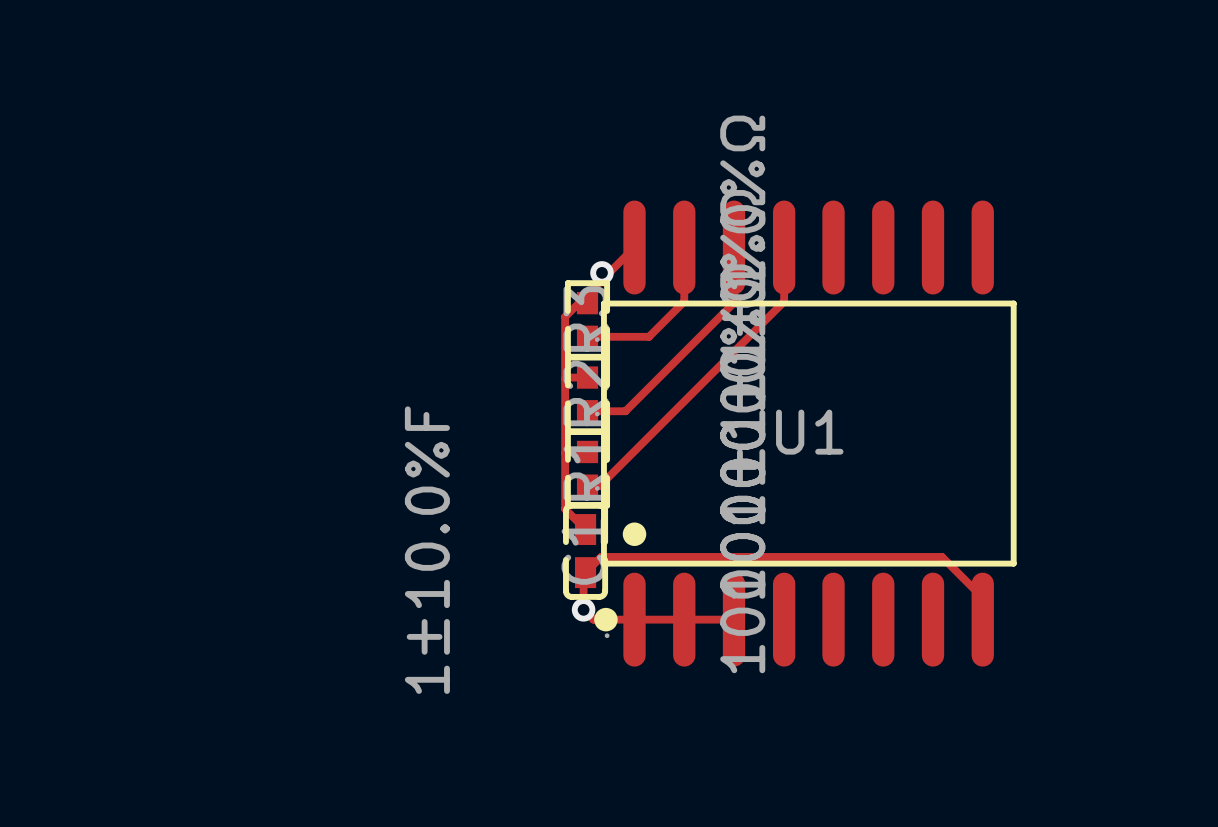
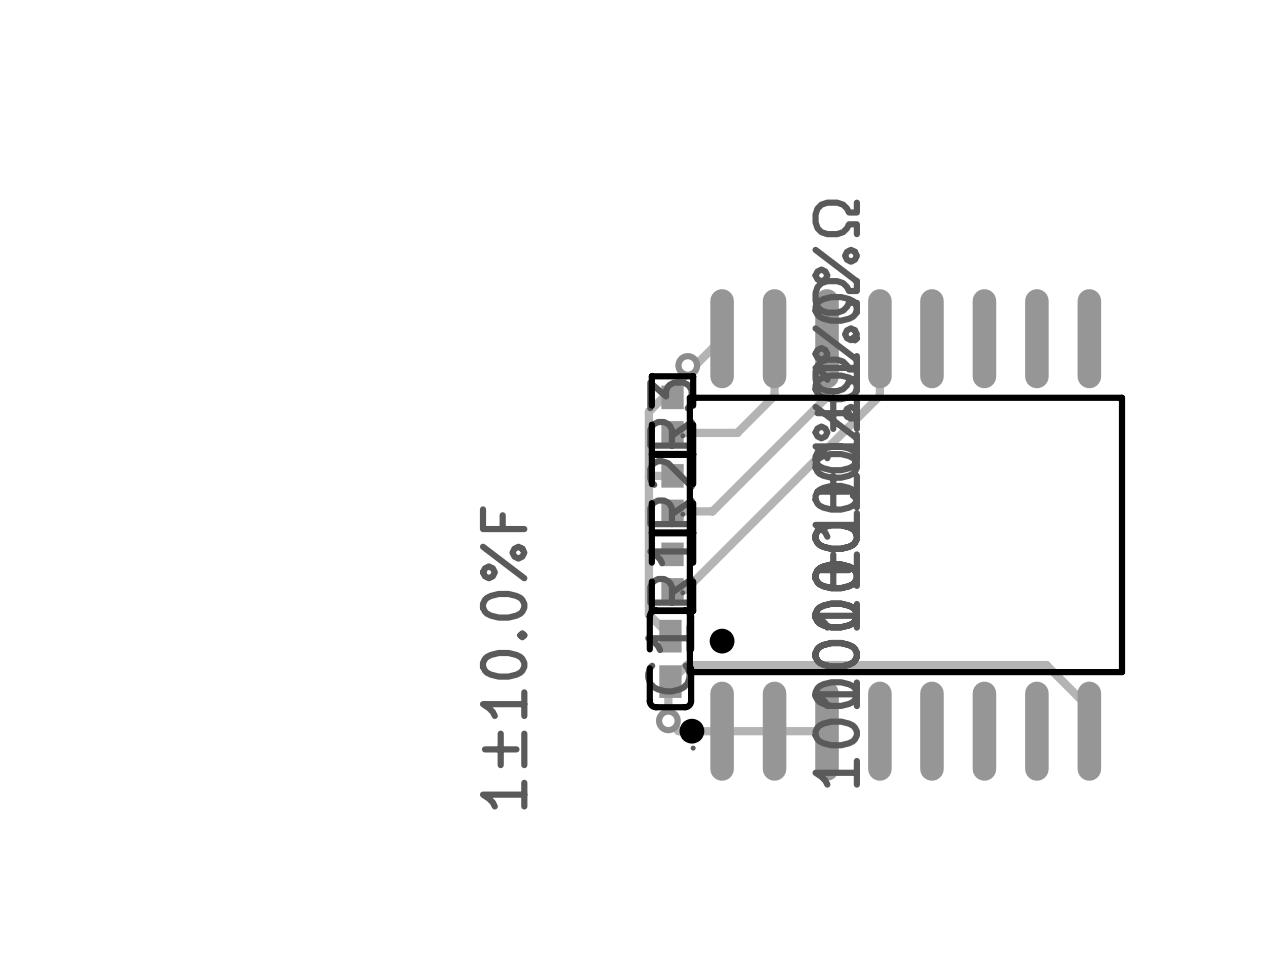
U1 name: U1 (809, 432) -> none

